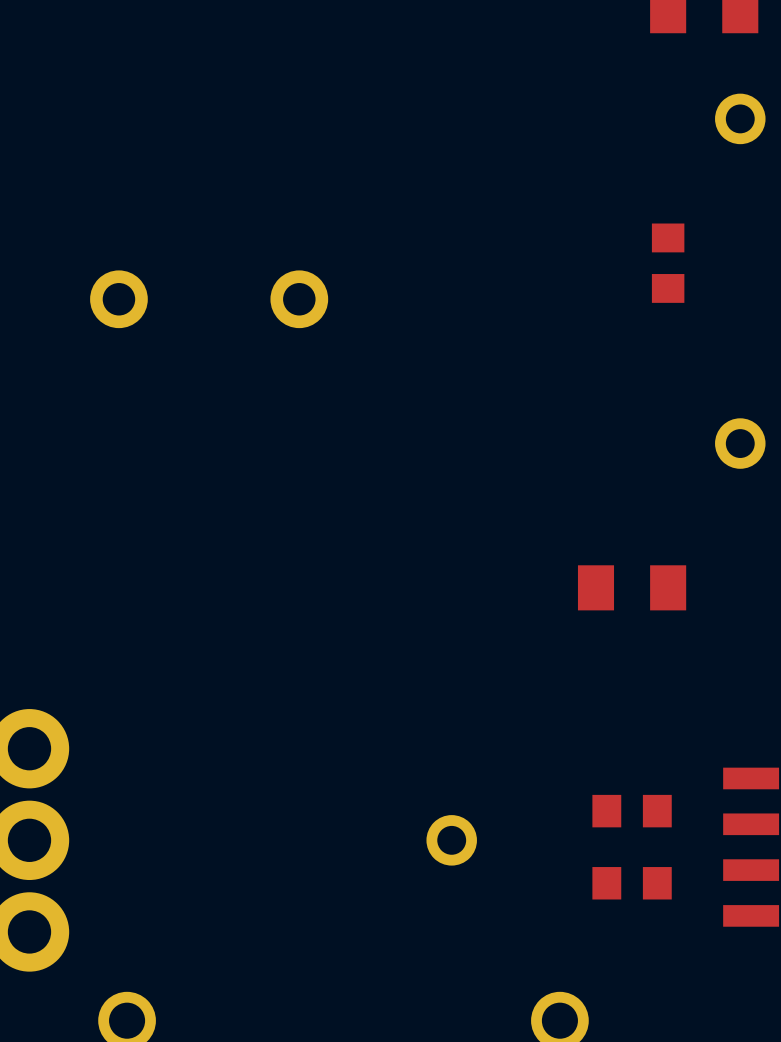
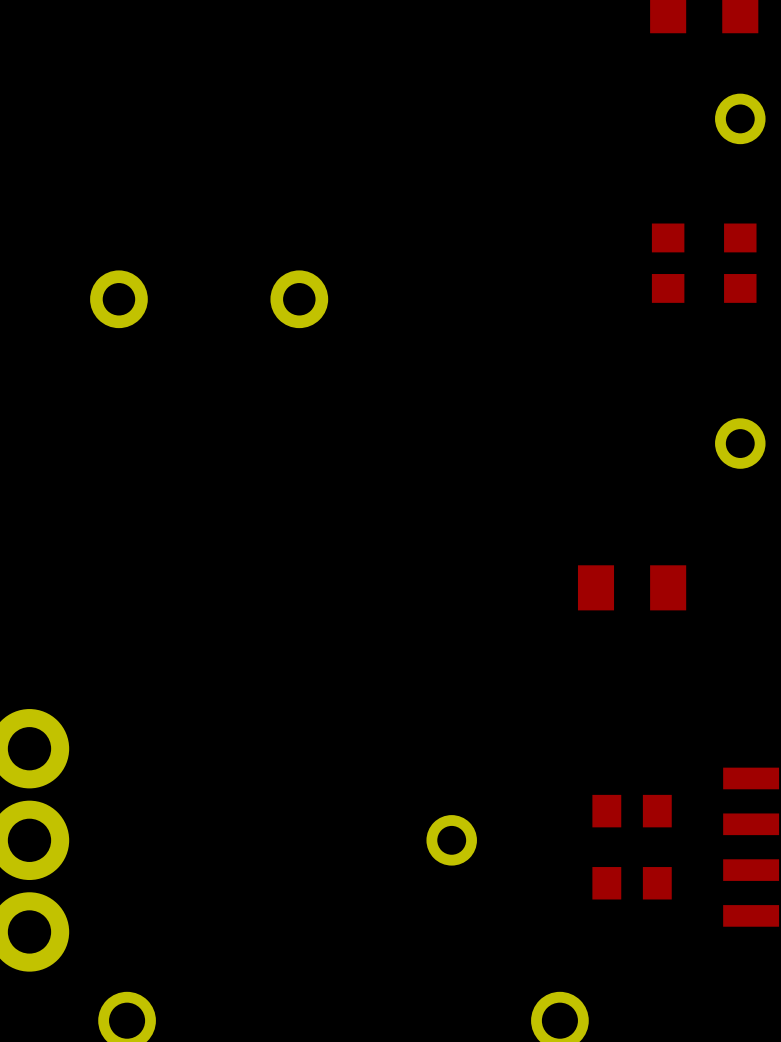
part: none -> (740, 263)

